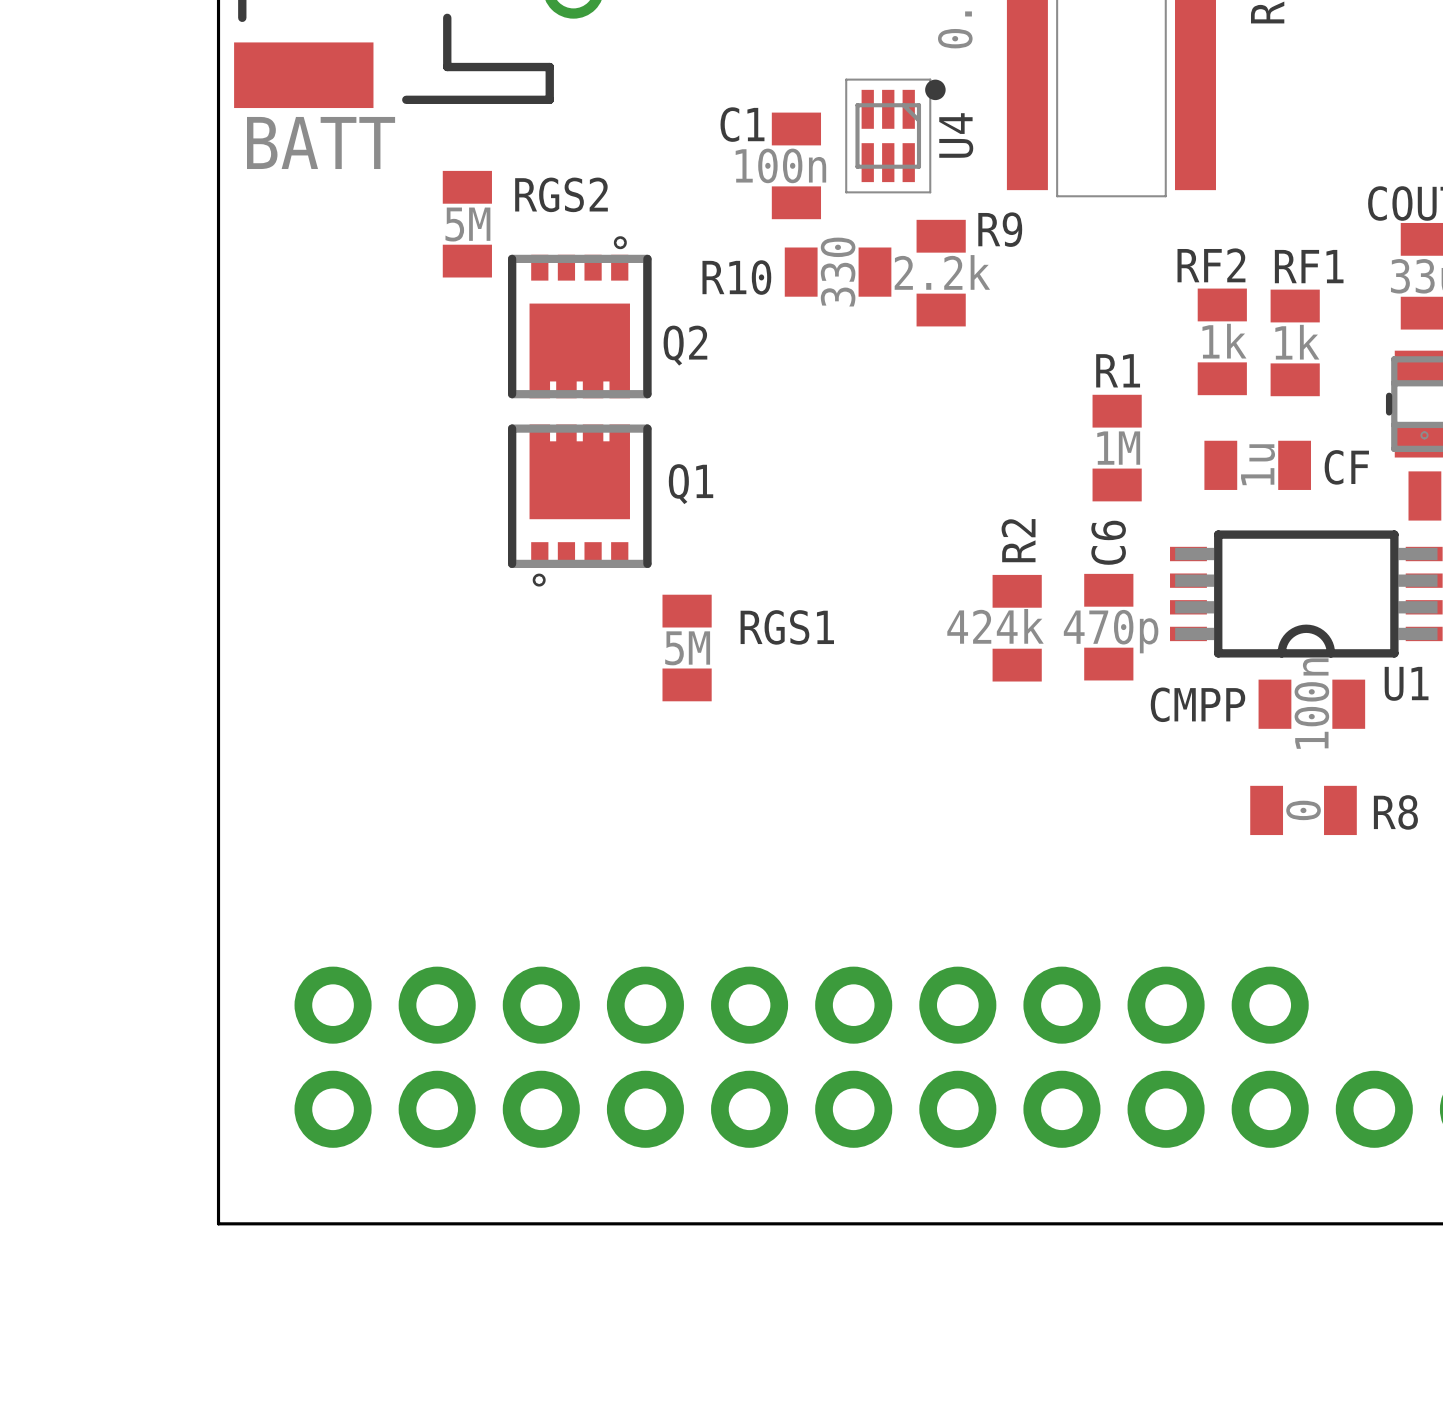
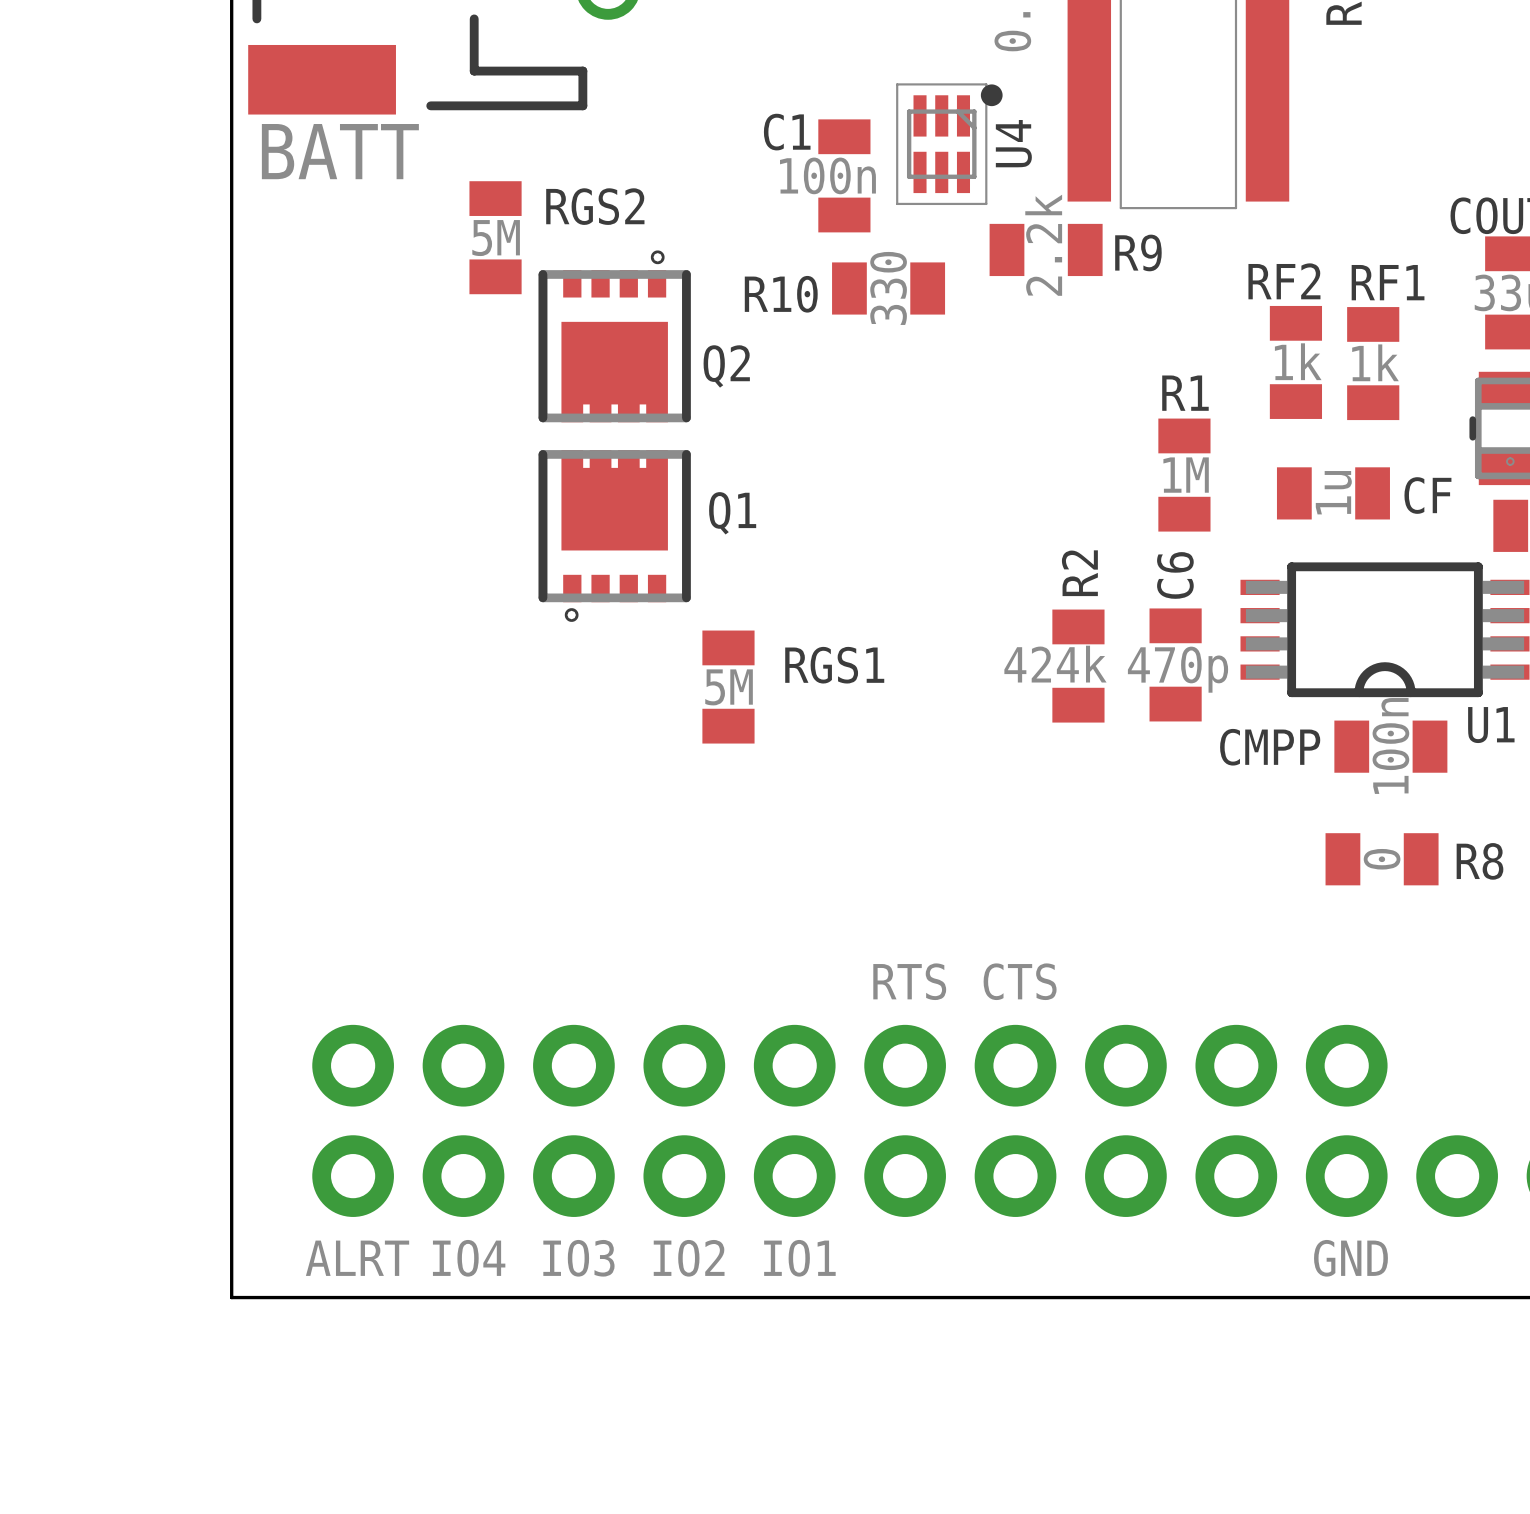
R9 rotation: 0° (941, 273) -> 90° clockwise (1046, 249)
text: none -> RTS (909, 981)
text: none -> CTS (1020, 981)
text: none -> ALRT (357, 1258)
text: none -> IO4 (469, 1258)
text: none -> IO3 (578, 1258)
text: none -> IO2 (689, 1258)
text: none -> IO1 (799, 1258)
text: none -> GND (1350, 1258)

